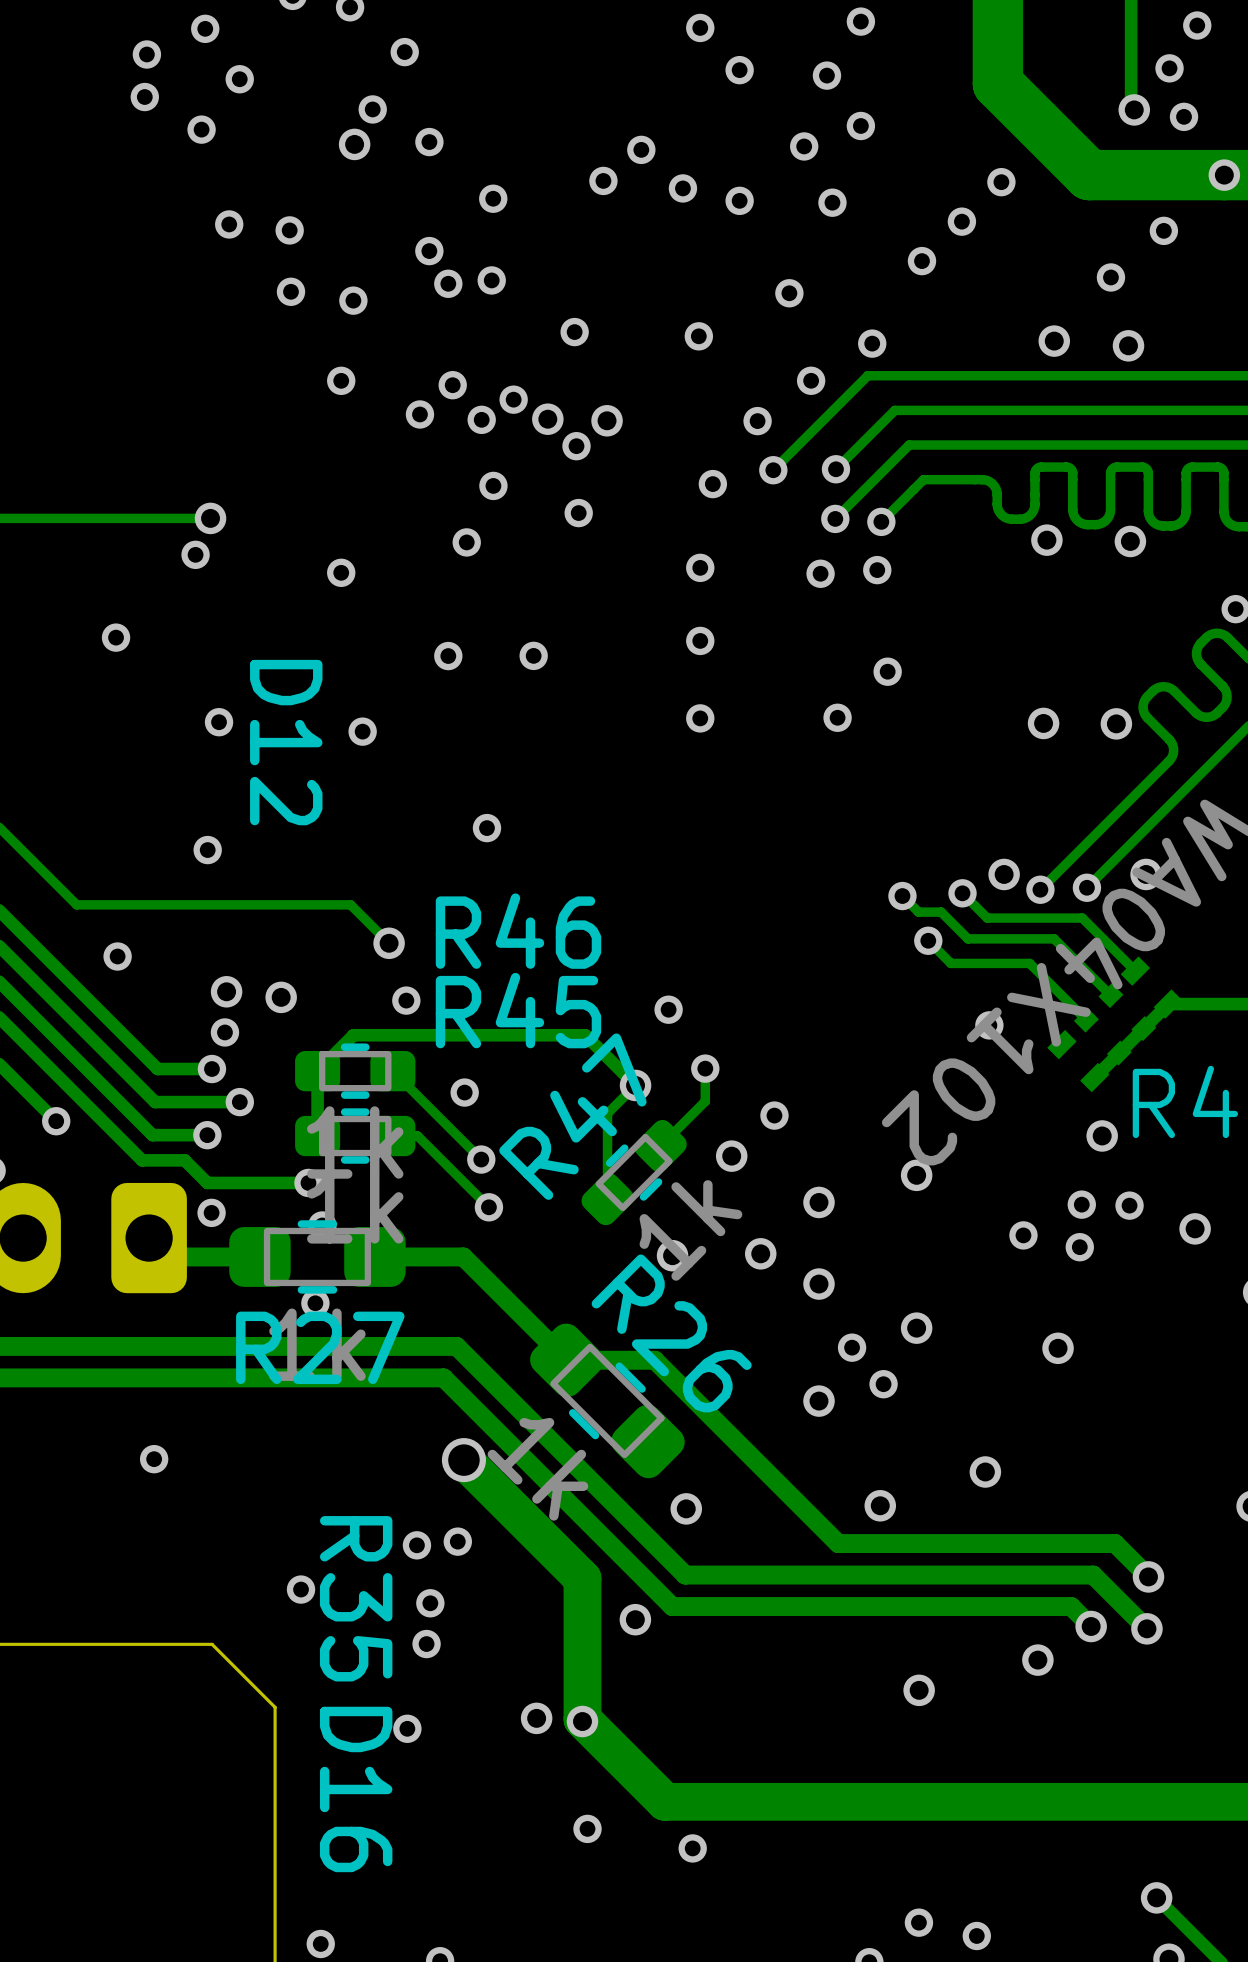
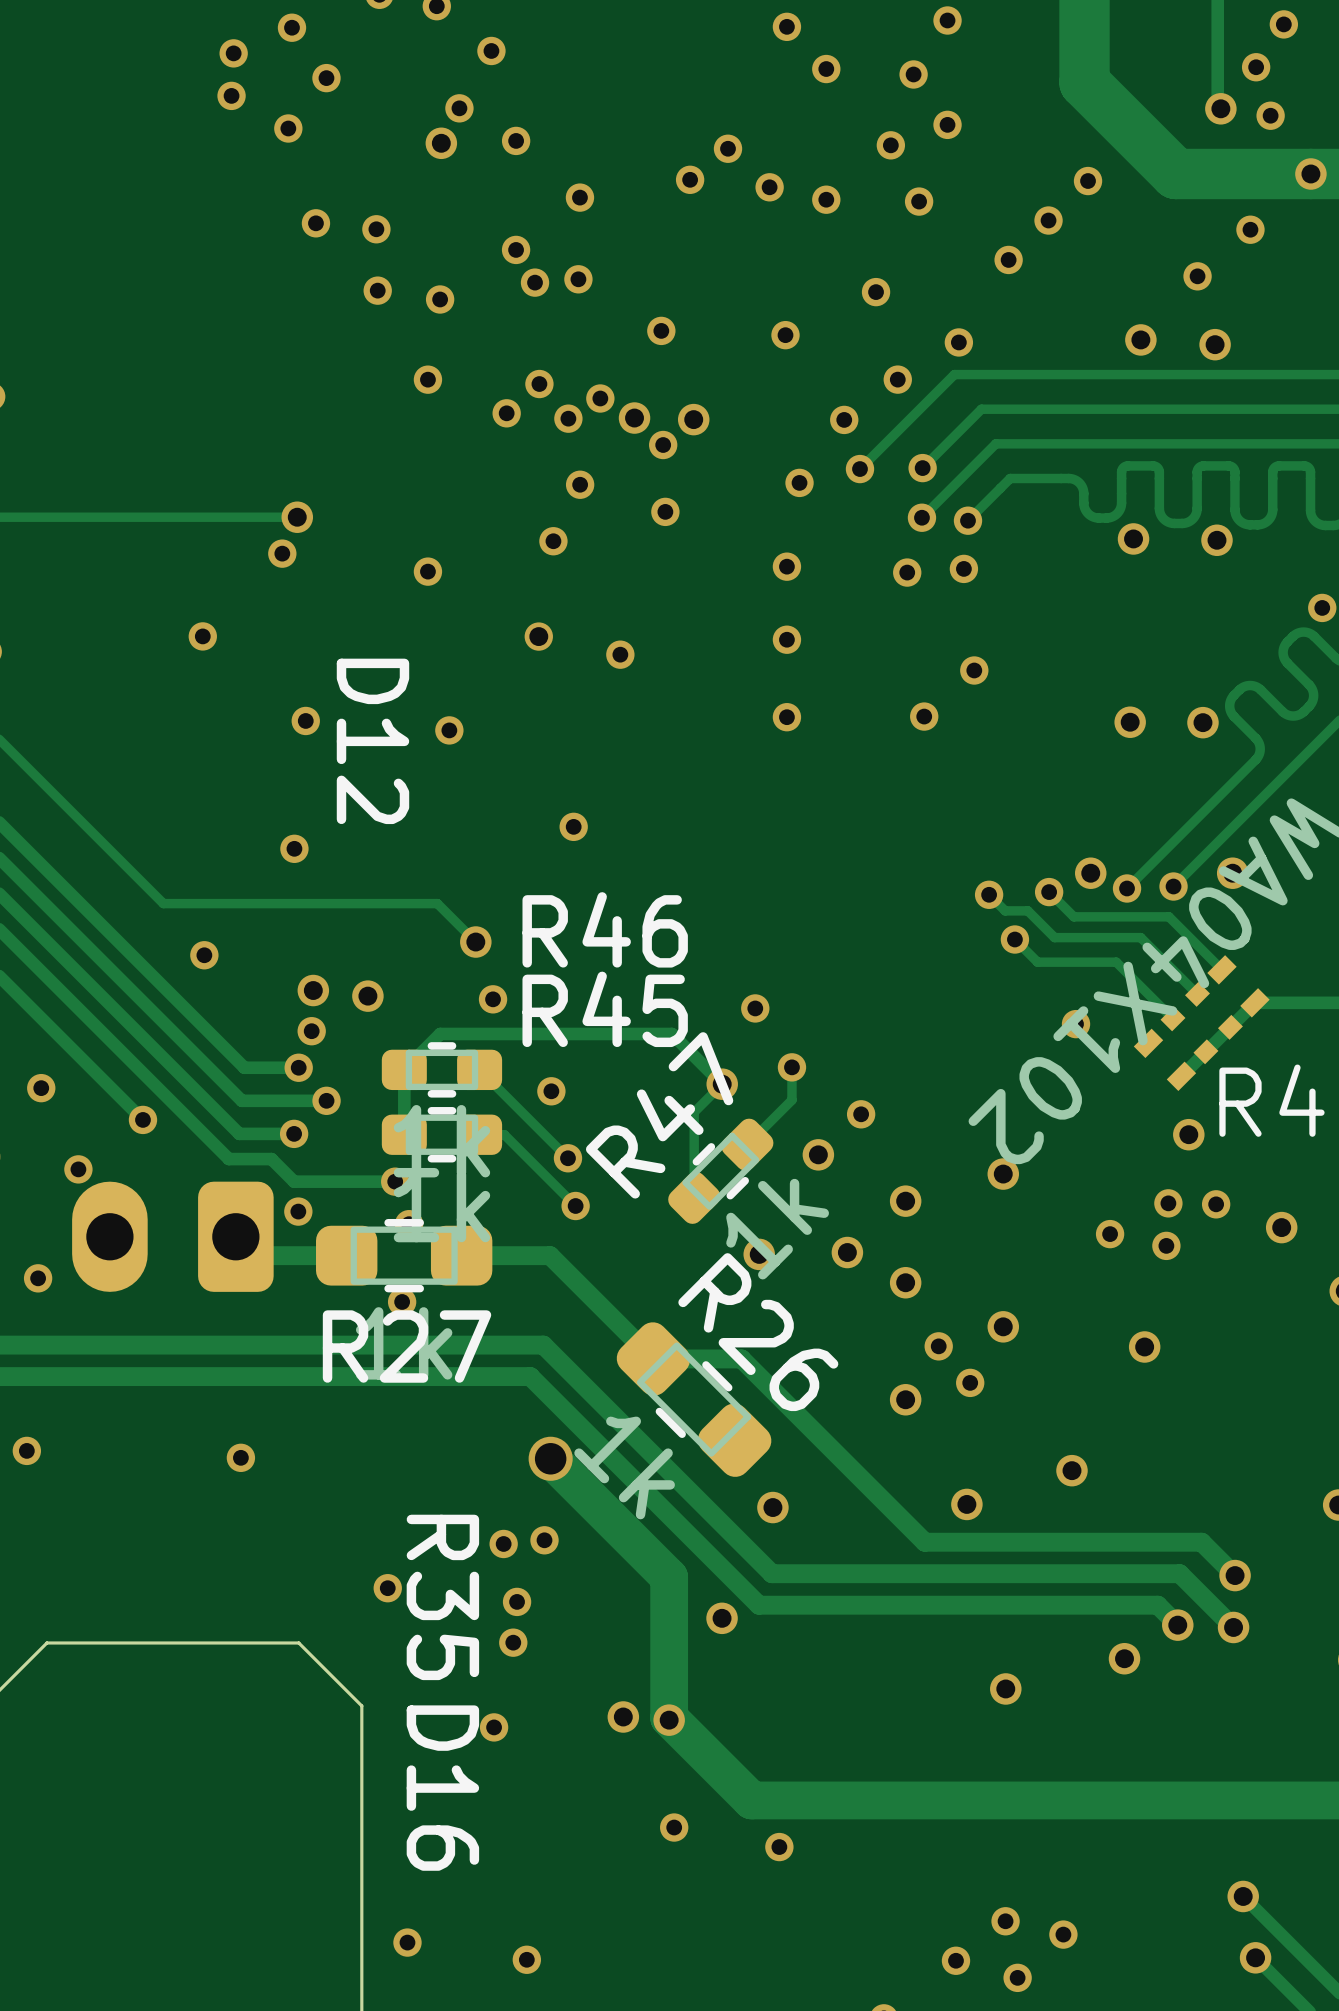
via position: (448, 656) -> (538, 636)

